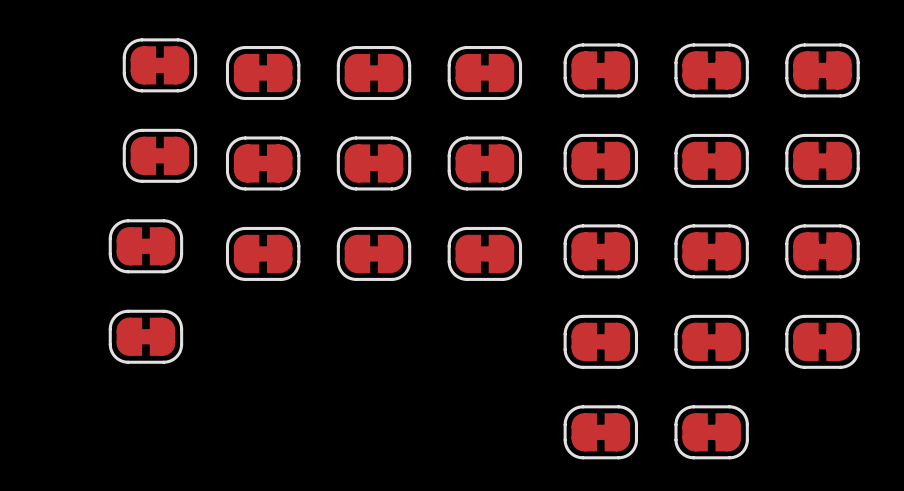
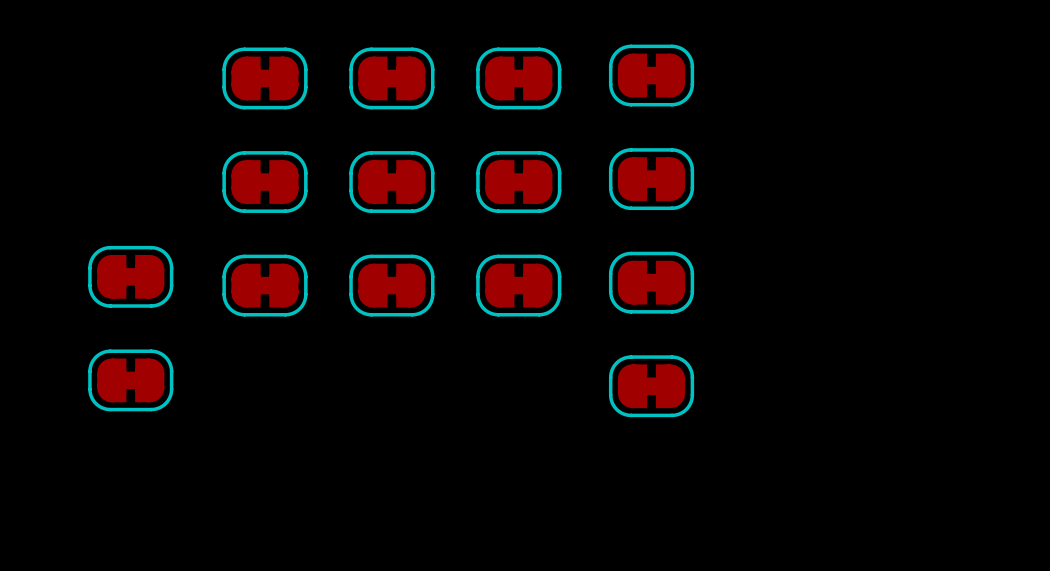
part: (159, 65) -> none
part: (711, 70) -> none
part: (822, 70) -> none
part: (159, 155) -> none
part: (711, 160) -> none
part: (822, 160) -> none
part: (711, 251) -> none
part: (822, 251) -> none
part: (711, 341) -> none
part: (822, 341) -> none
part: (600, 432) -> none
part: (711, 432) -> none

